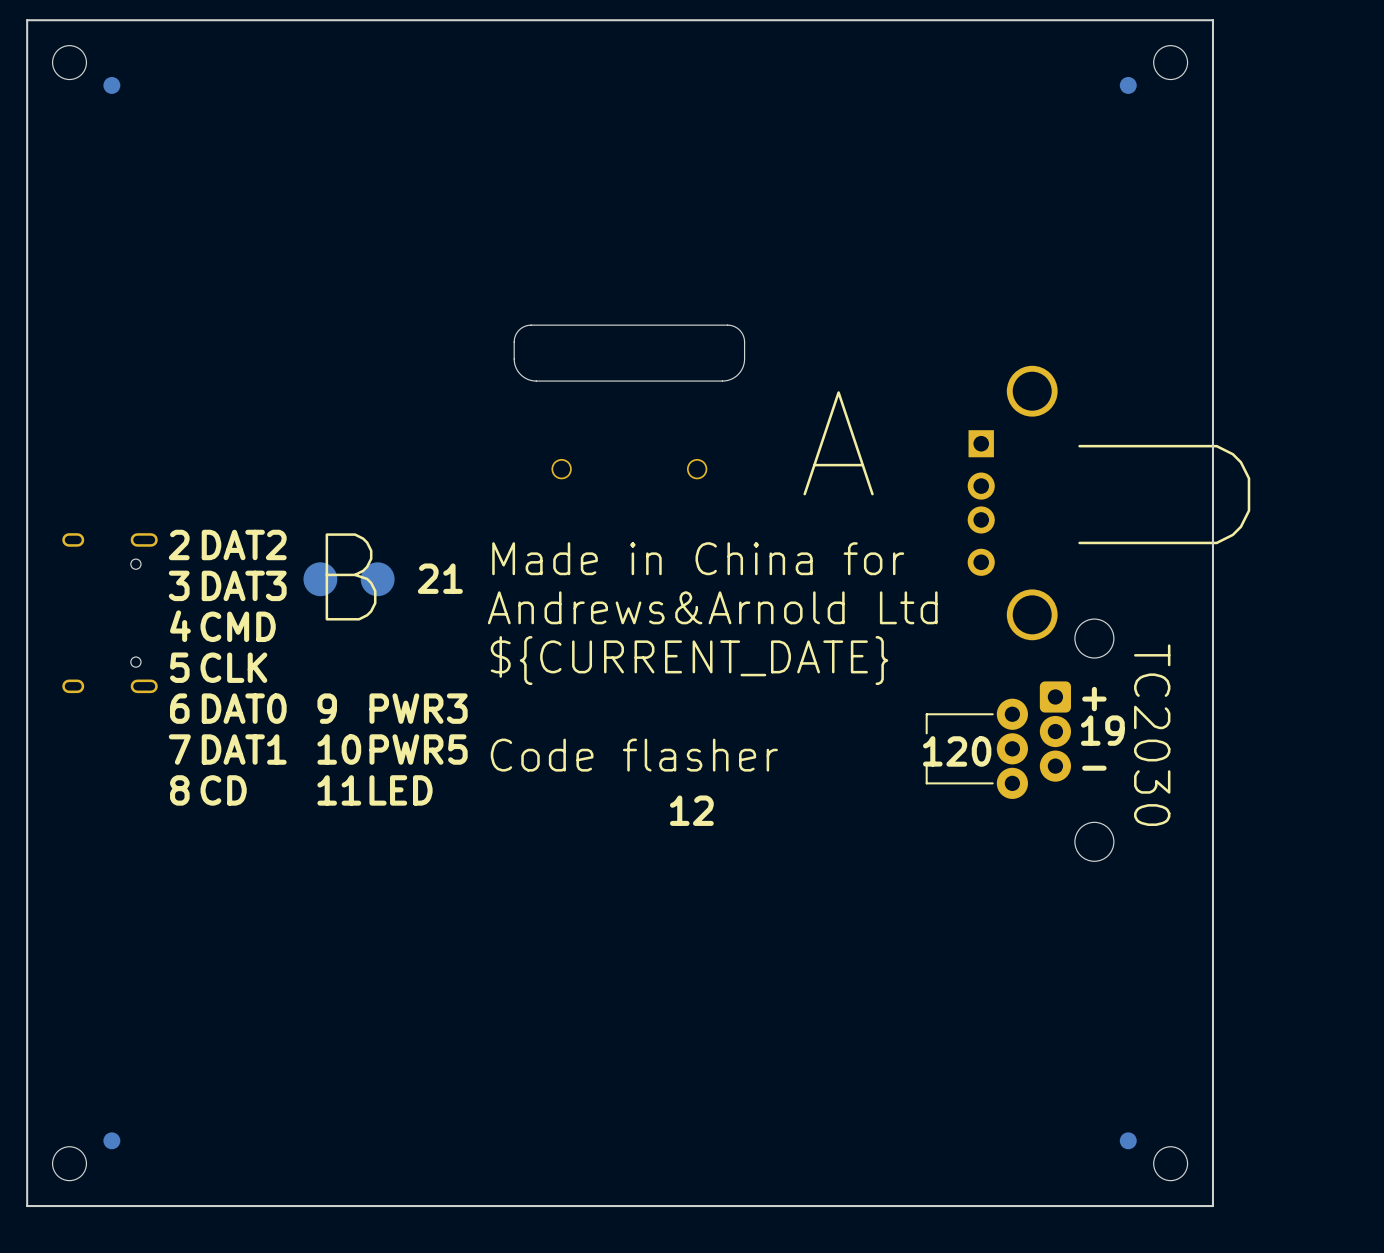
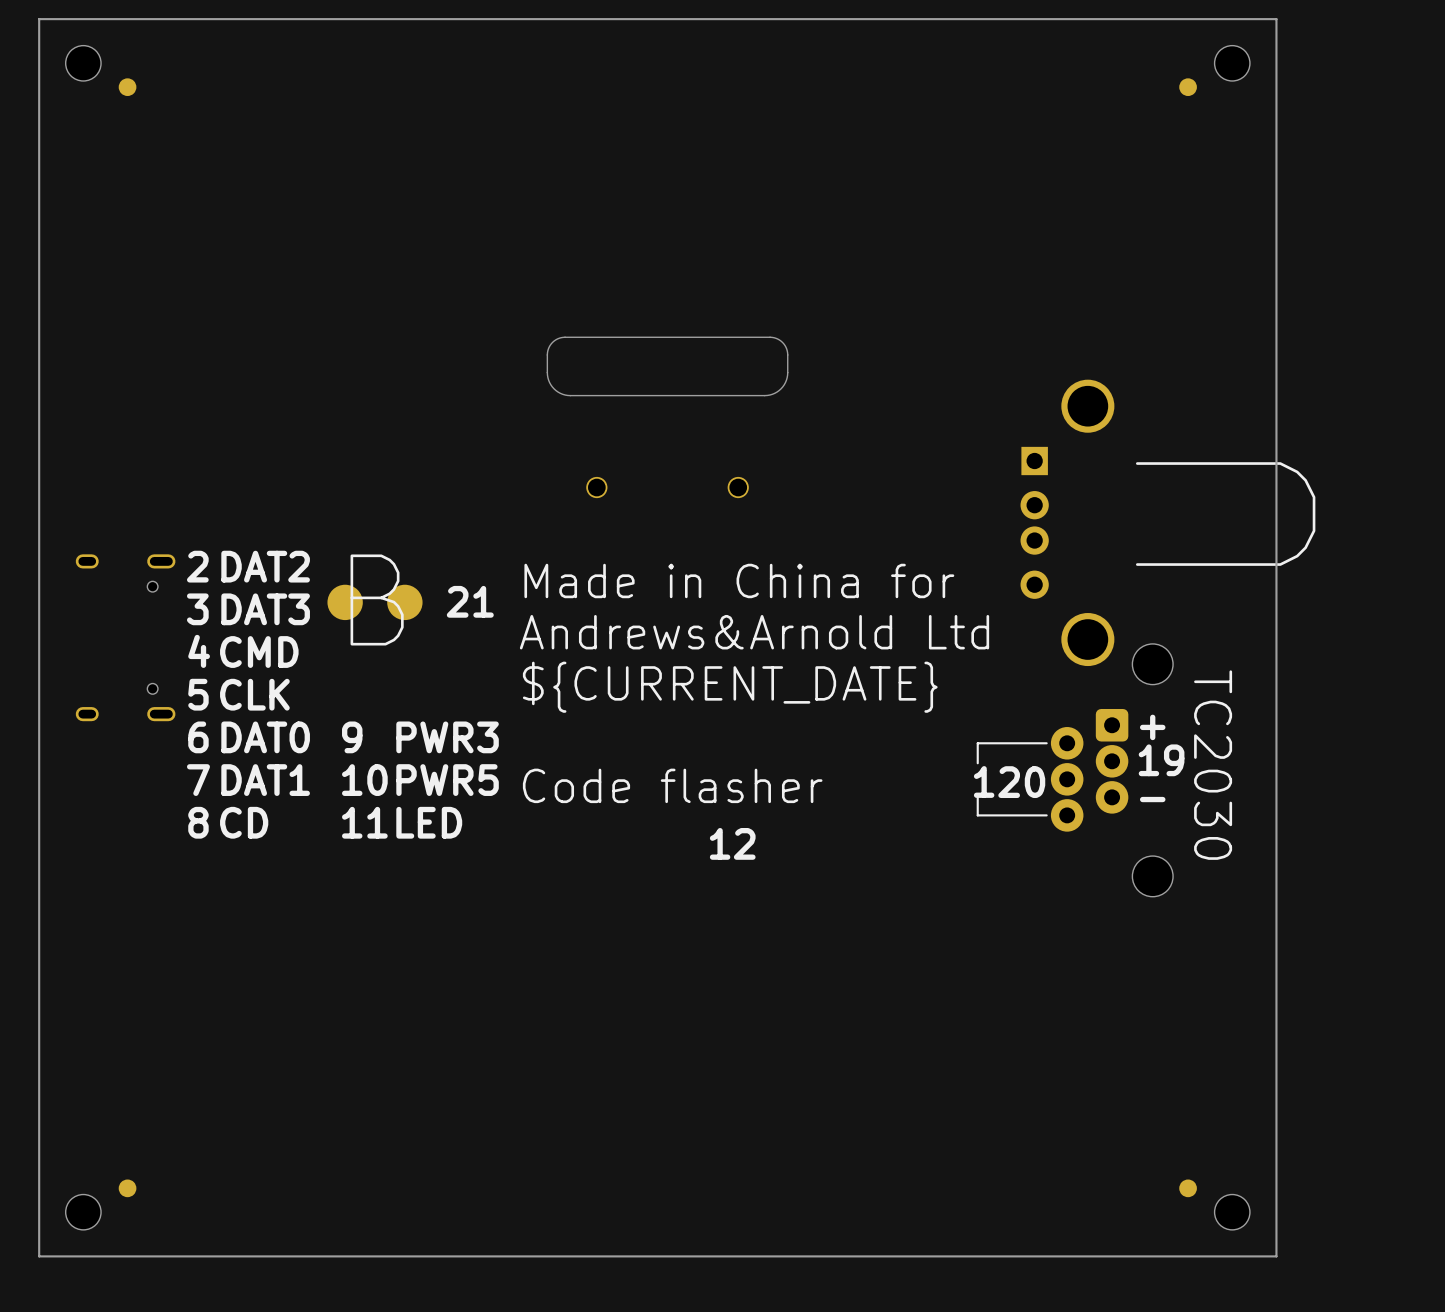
text: A (838, 443) -> none

